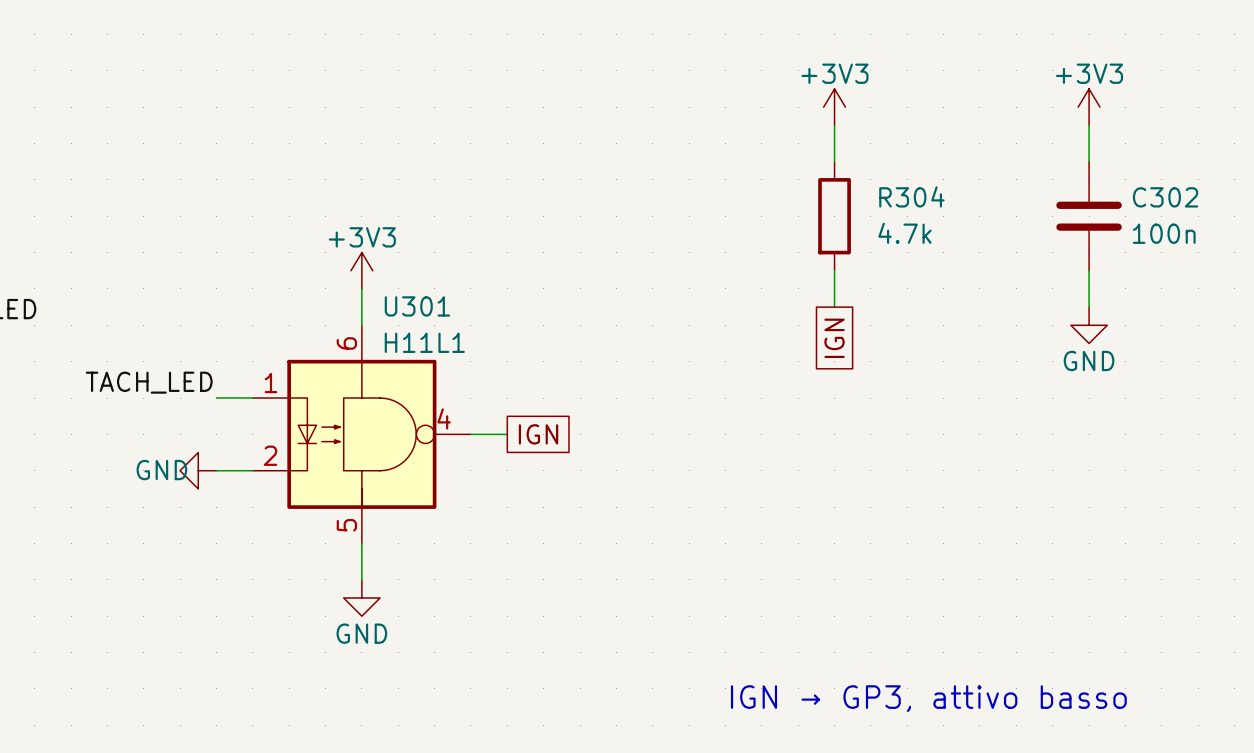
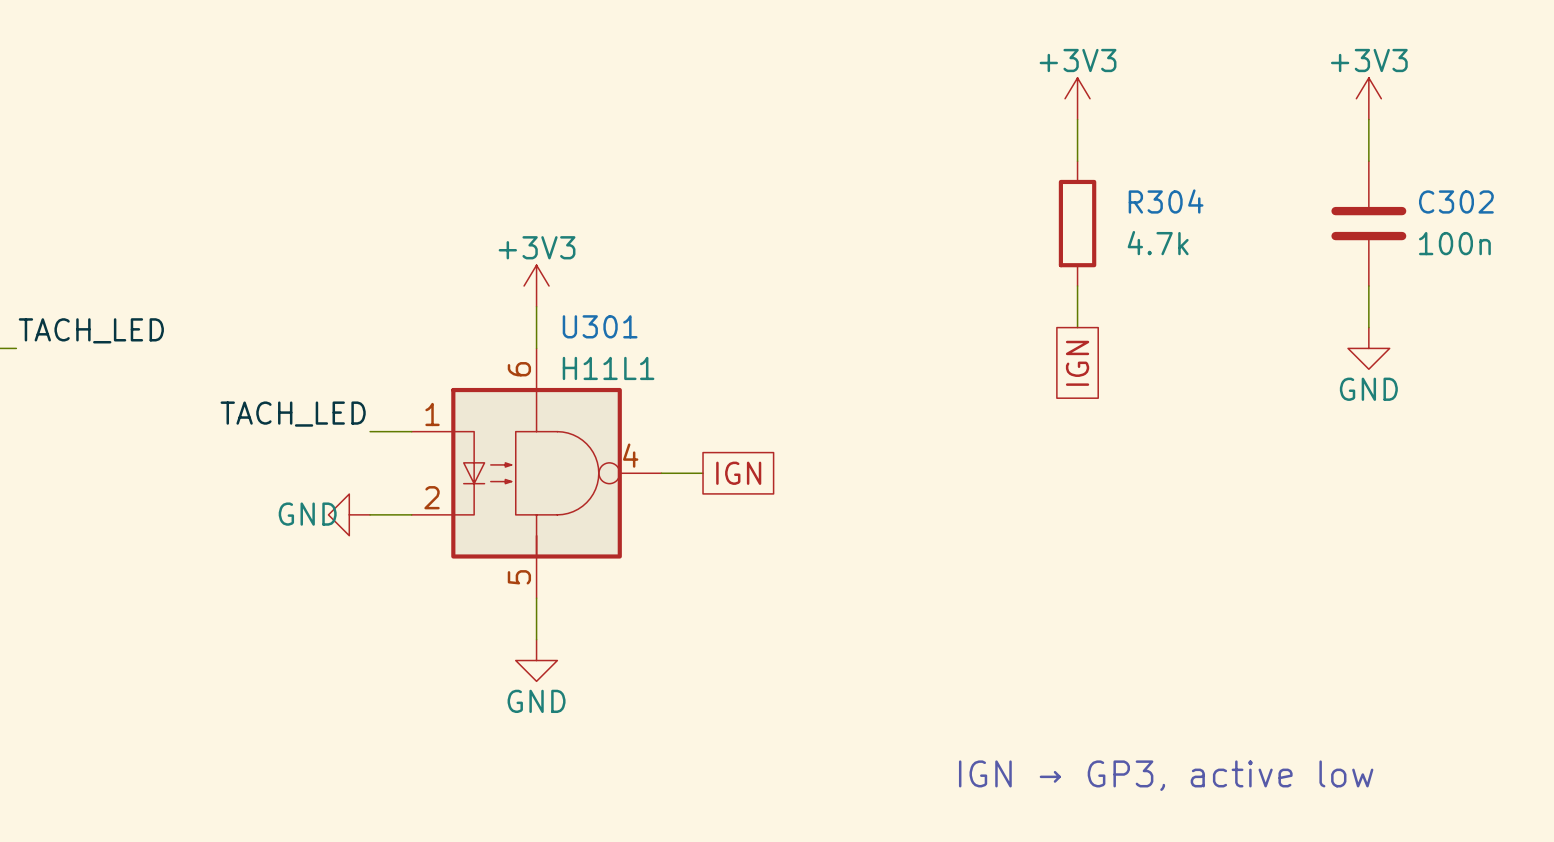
text: IGN → GP3, attivo basso (928, 698) -> IGN → GP3, active low (1166, 775)

